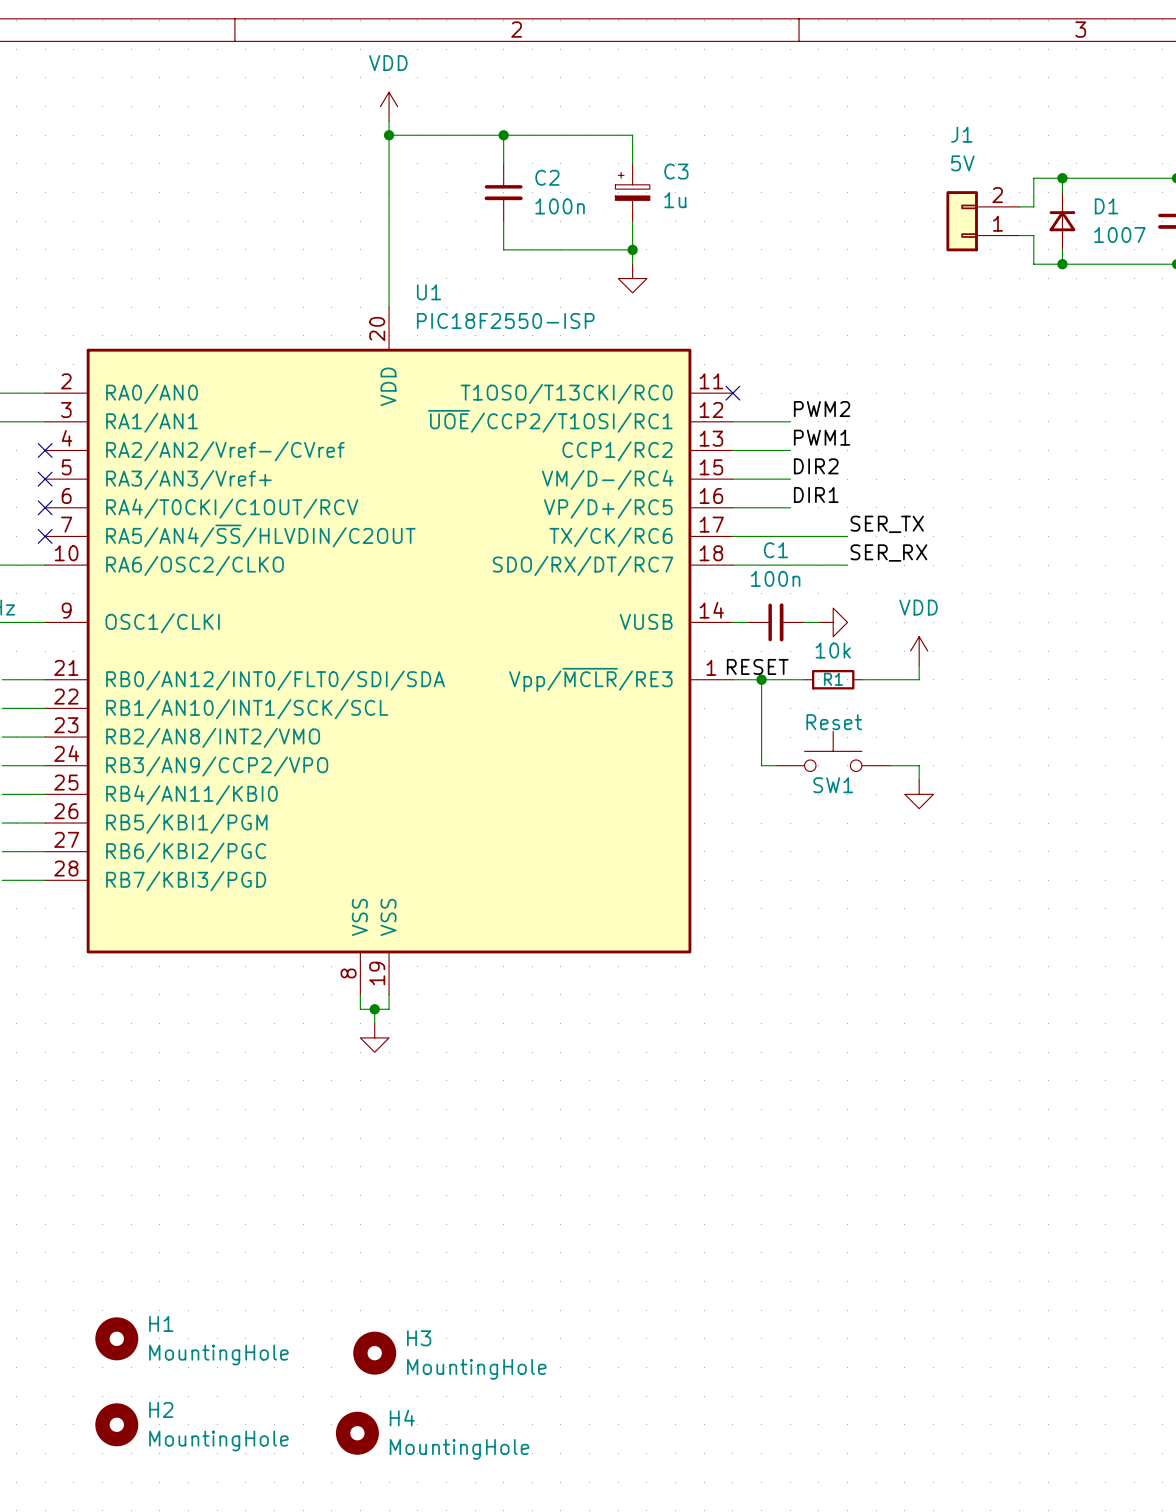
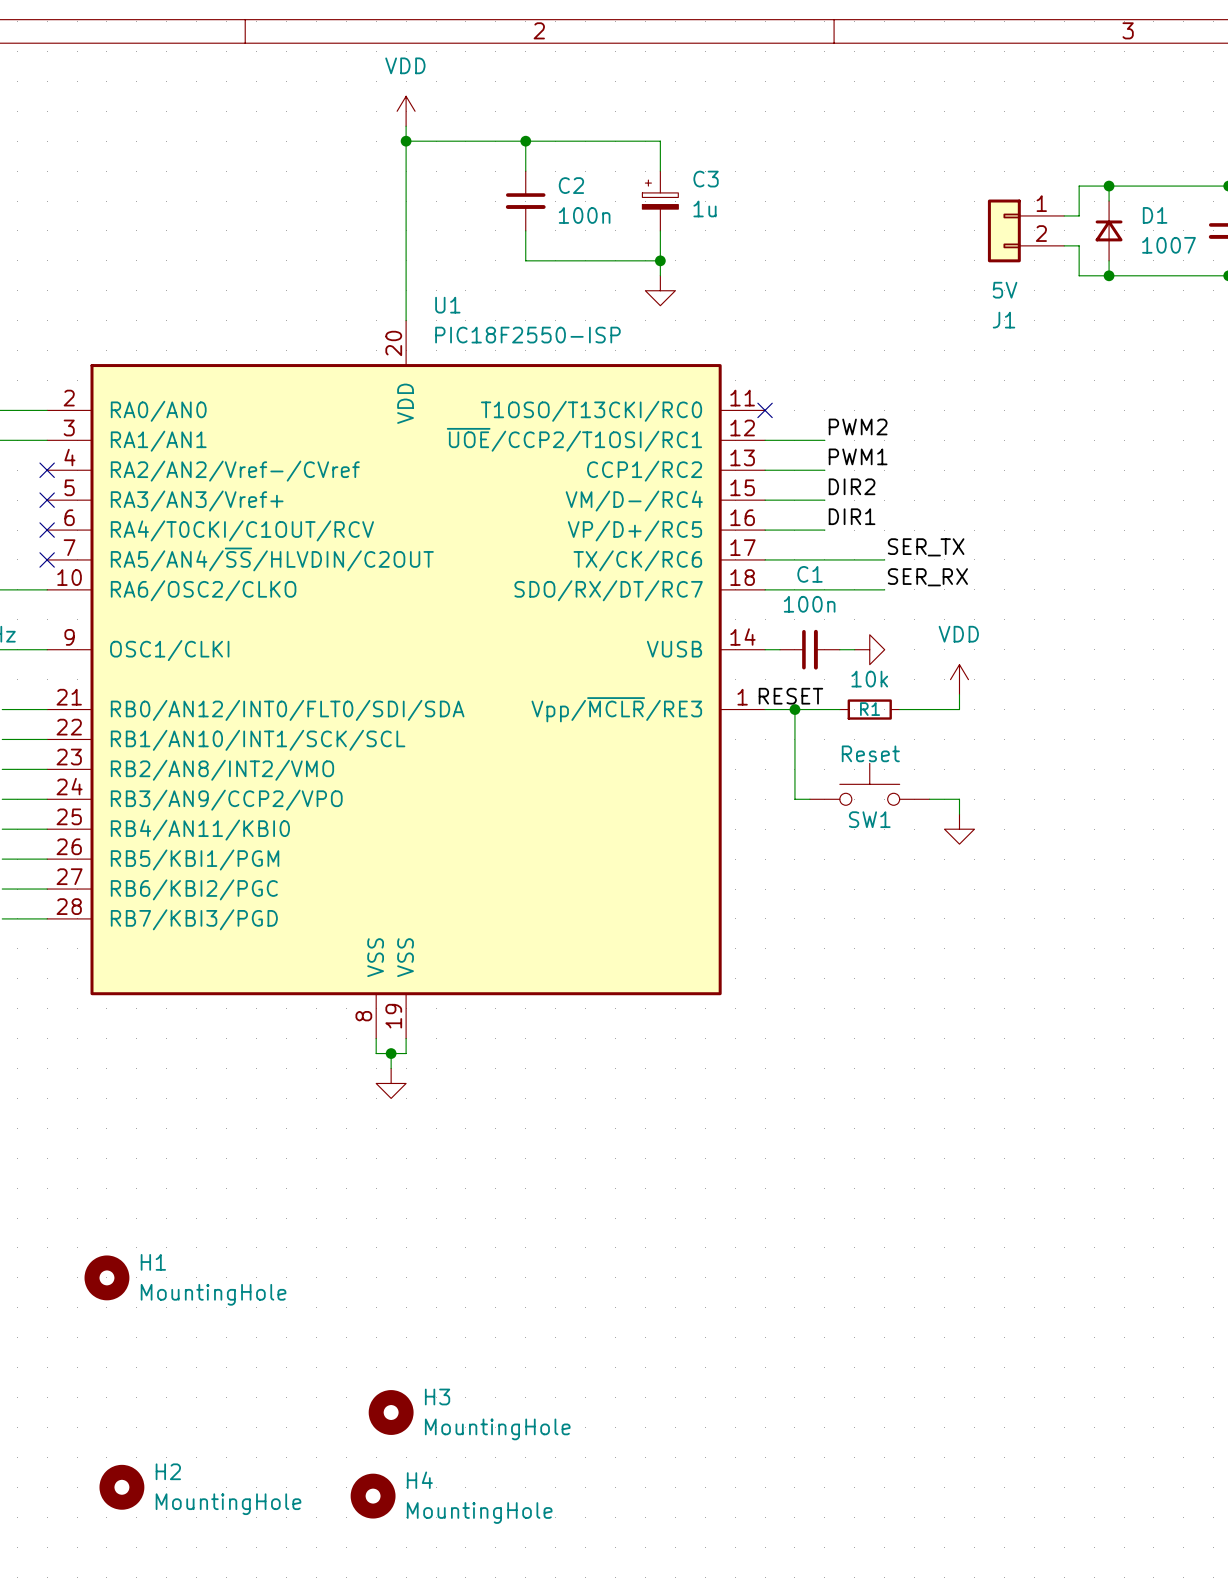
J1 flip: as is (962, 221) -> up-down (1004, 230)
H1 position: (116, 1338) -> (106, 1277)

